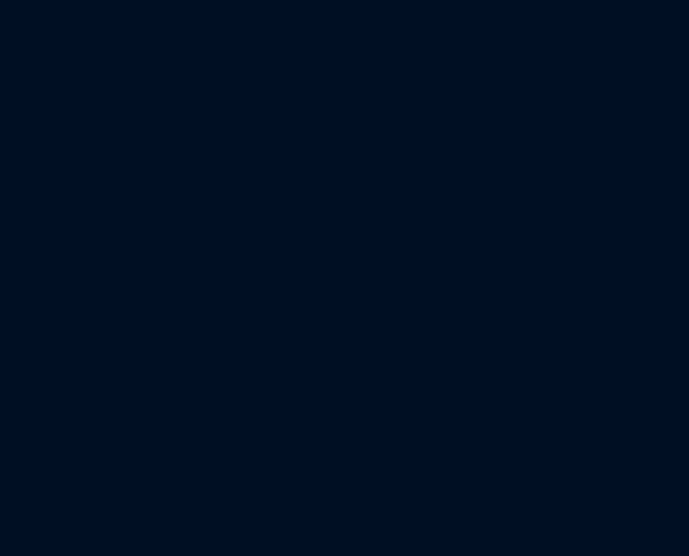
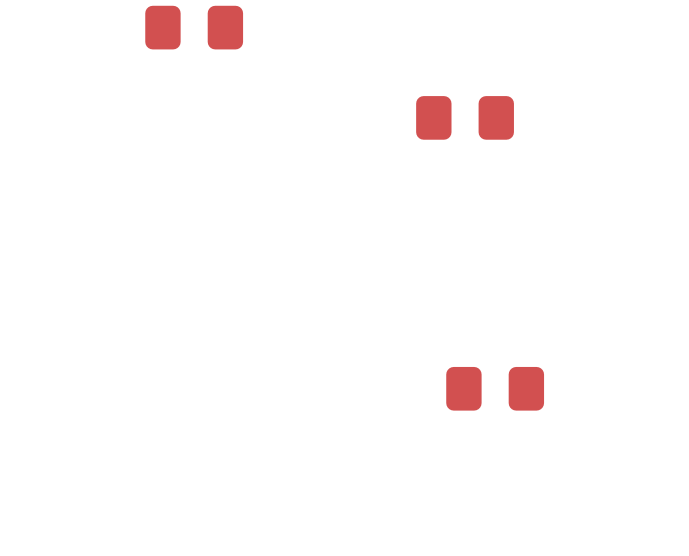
part: none -> (194, 27)
part: none -> (465, 117)
part: none -> (495, 388)

